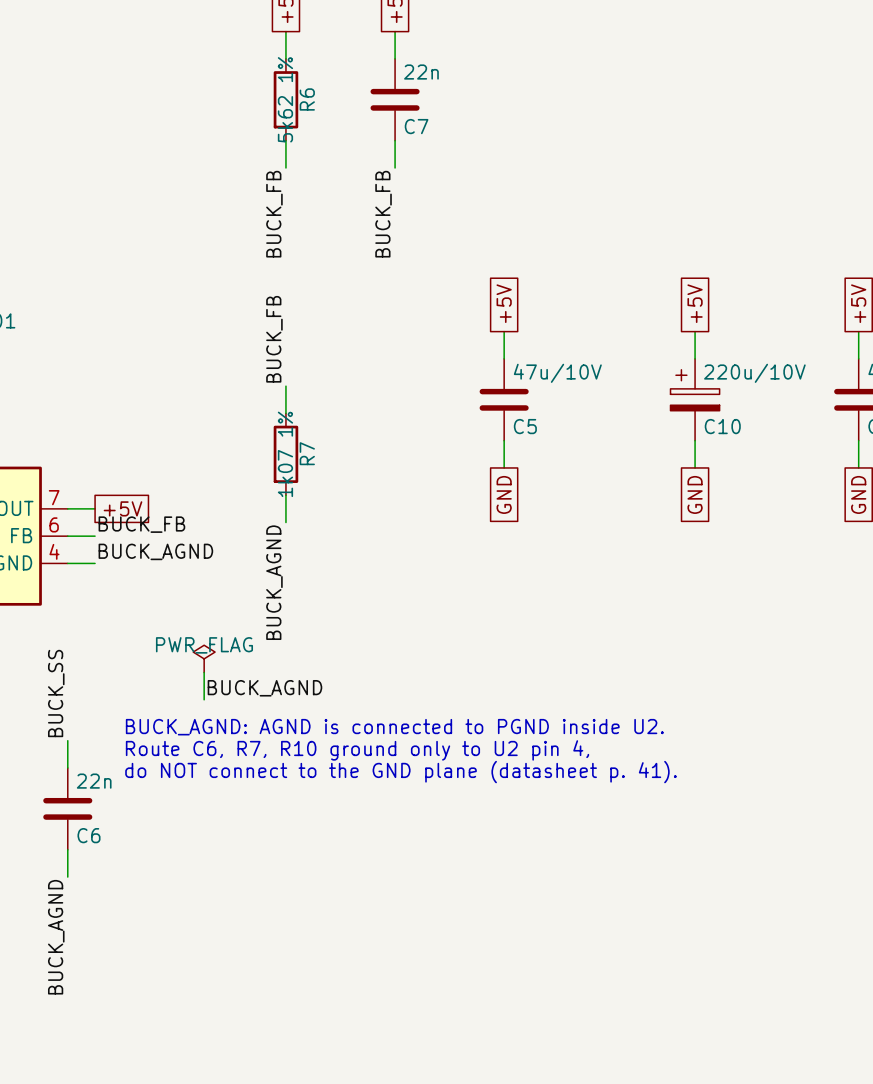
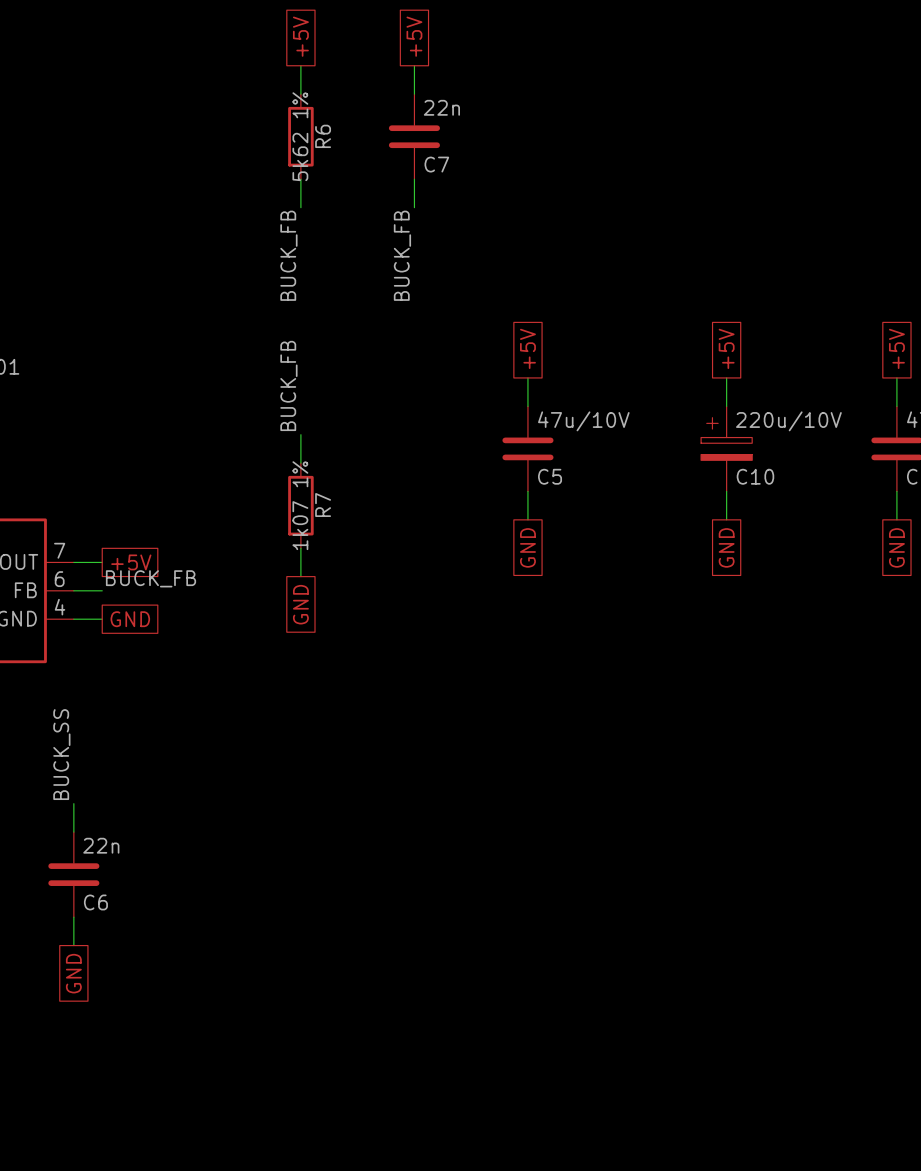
global label: none -> GND (300, 604)
label: BUCK_AGND (155, 551) -> none
global label: none -> GND (130, 619)
label: BUCK_AGND (274, 582) -> none
power symbol: PWR_FLAG (204, 658) -> none
wire: (204, 672) (204, 699) -> none
label: BUCK_AGND (264, 688) -> none
text: BUCK_AGND: AGND is connected to PGND inside U2. (394, 727) -> none
text: Route C6, R7, R10 ground only to U2 pin 4, (357, 750) -> none
text: do NOT connect to the GND plane (datasheet p. 41). (401, 772) -> none
global label: none -> GND (73, 973)
label: BUCK_AGND (56, 937) -> none

